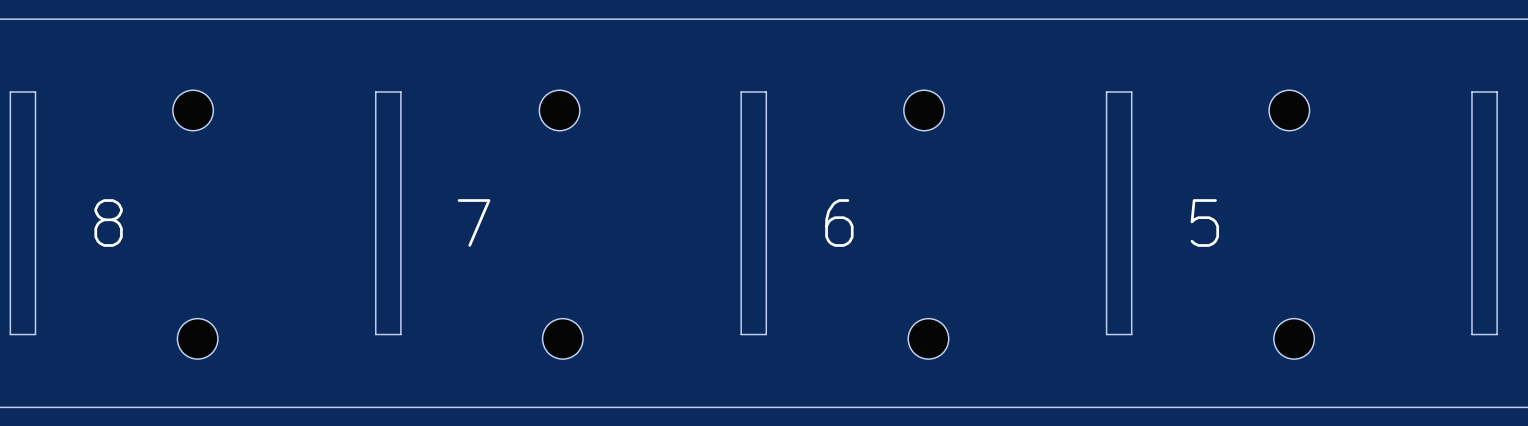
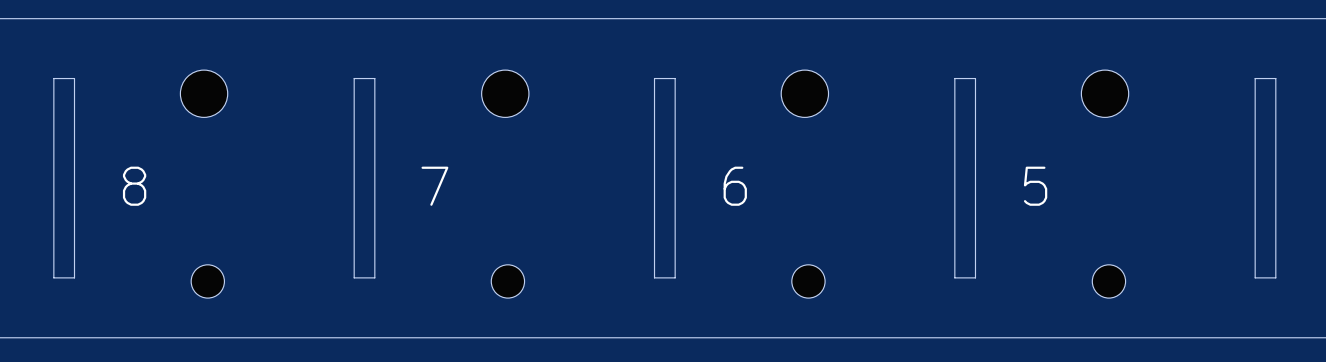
part footprint: [172, 90, 214, 131] -> [180, 70, 228, 118]
part footprint: [539, 90, 580, 131] -> [481, 70, 529, 118]
part footprint: [903, 90, 945, 131] -> [781, 70, 829, 118]
part footprint: [1269, 90, 1310, 131] -> [1081, 70, 1129, 118]

